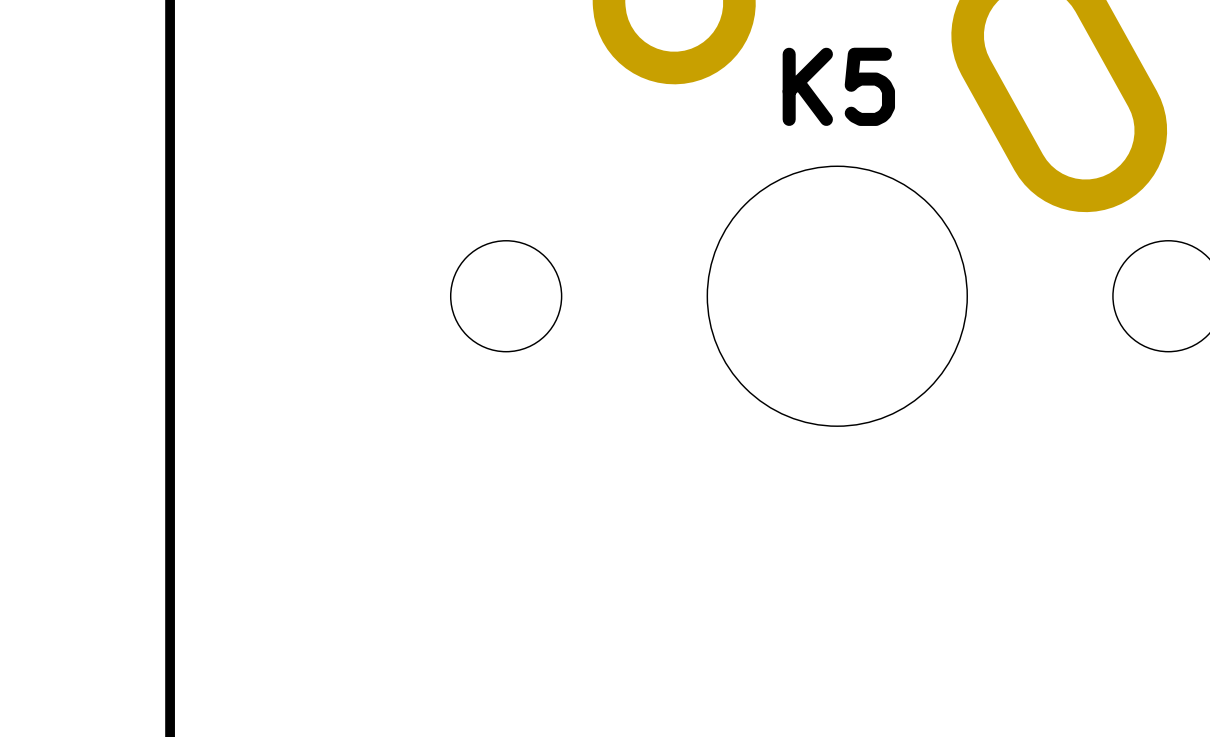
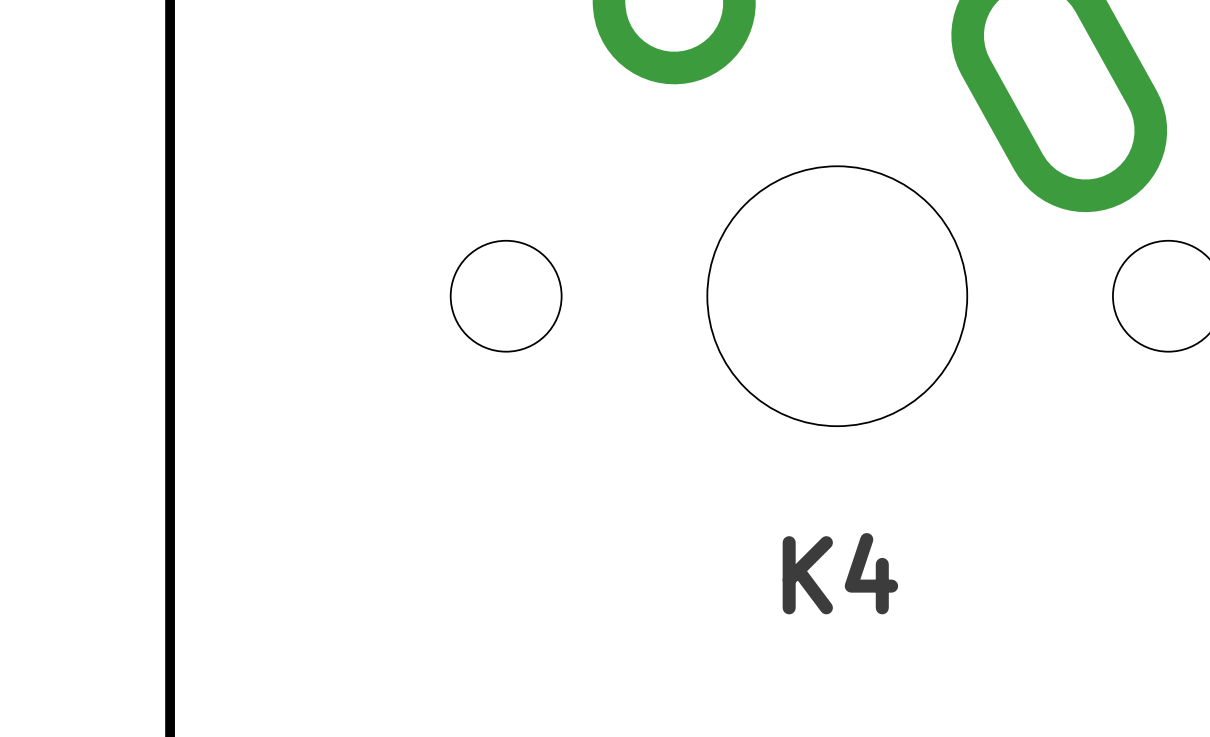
K5 name: K5 (838, 86) -> K4 (840, 573)

